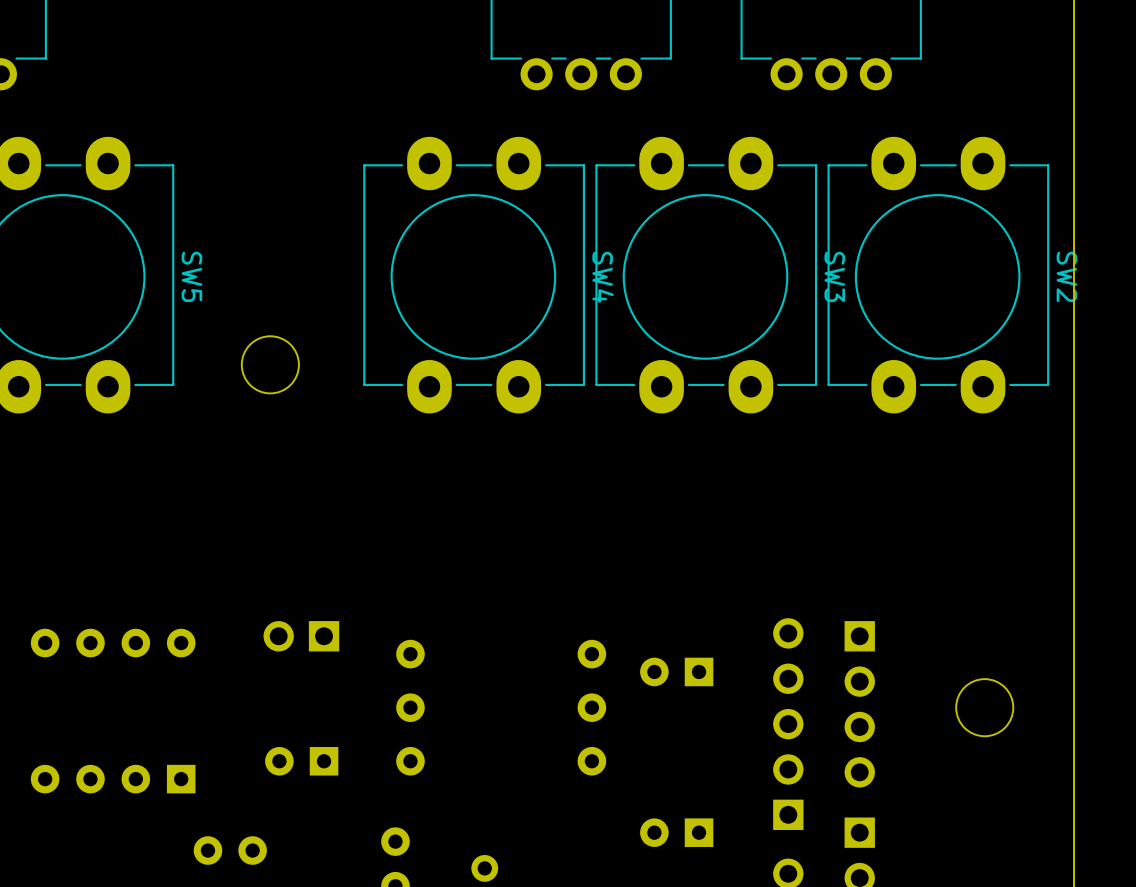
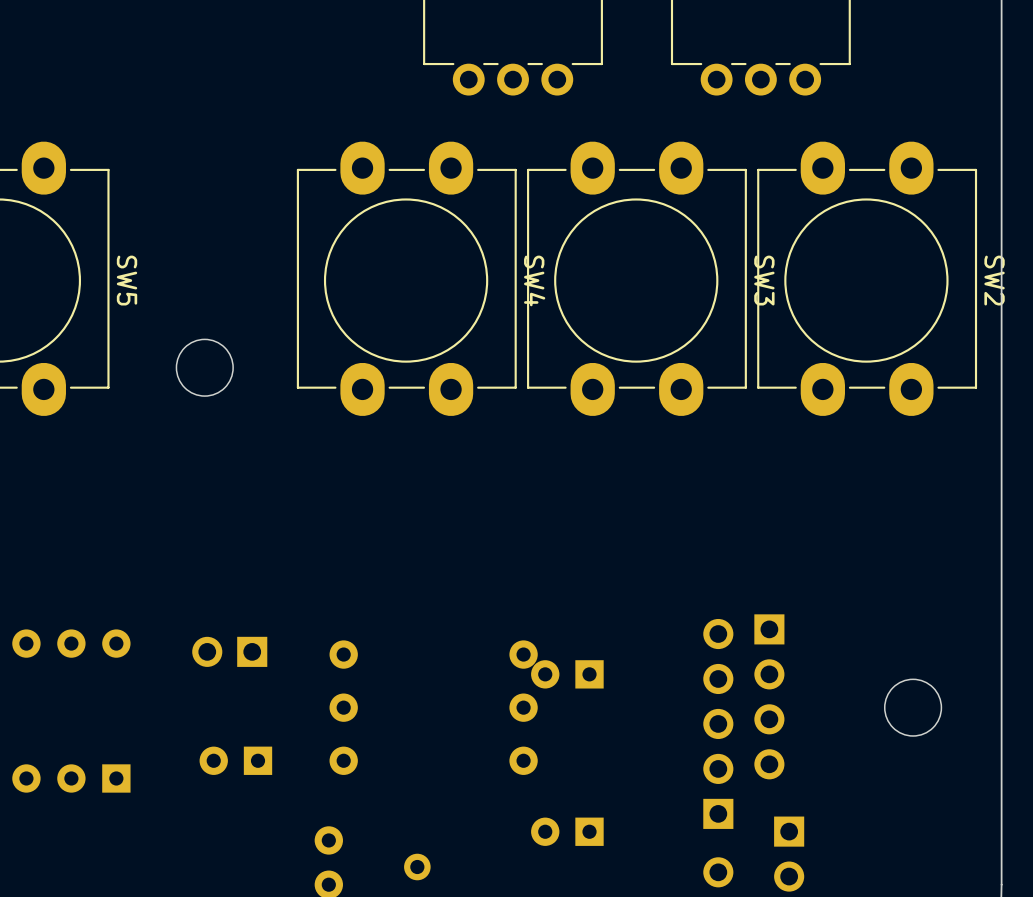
part position: (301, 636) -> (229, 651)
part position: (676, 671) -> (567, 674)
part position: (859, 704) -> (769, 696)
part position: (676, 832) -> (567, 831)
part: (230, 850) -> none

